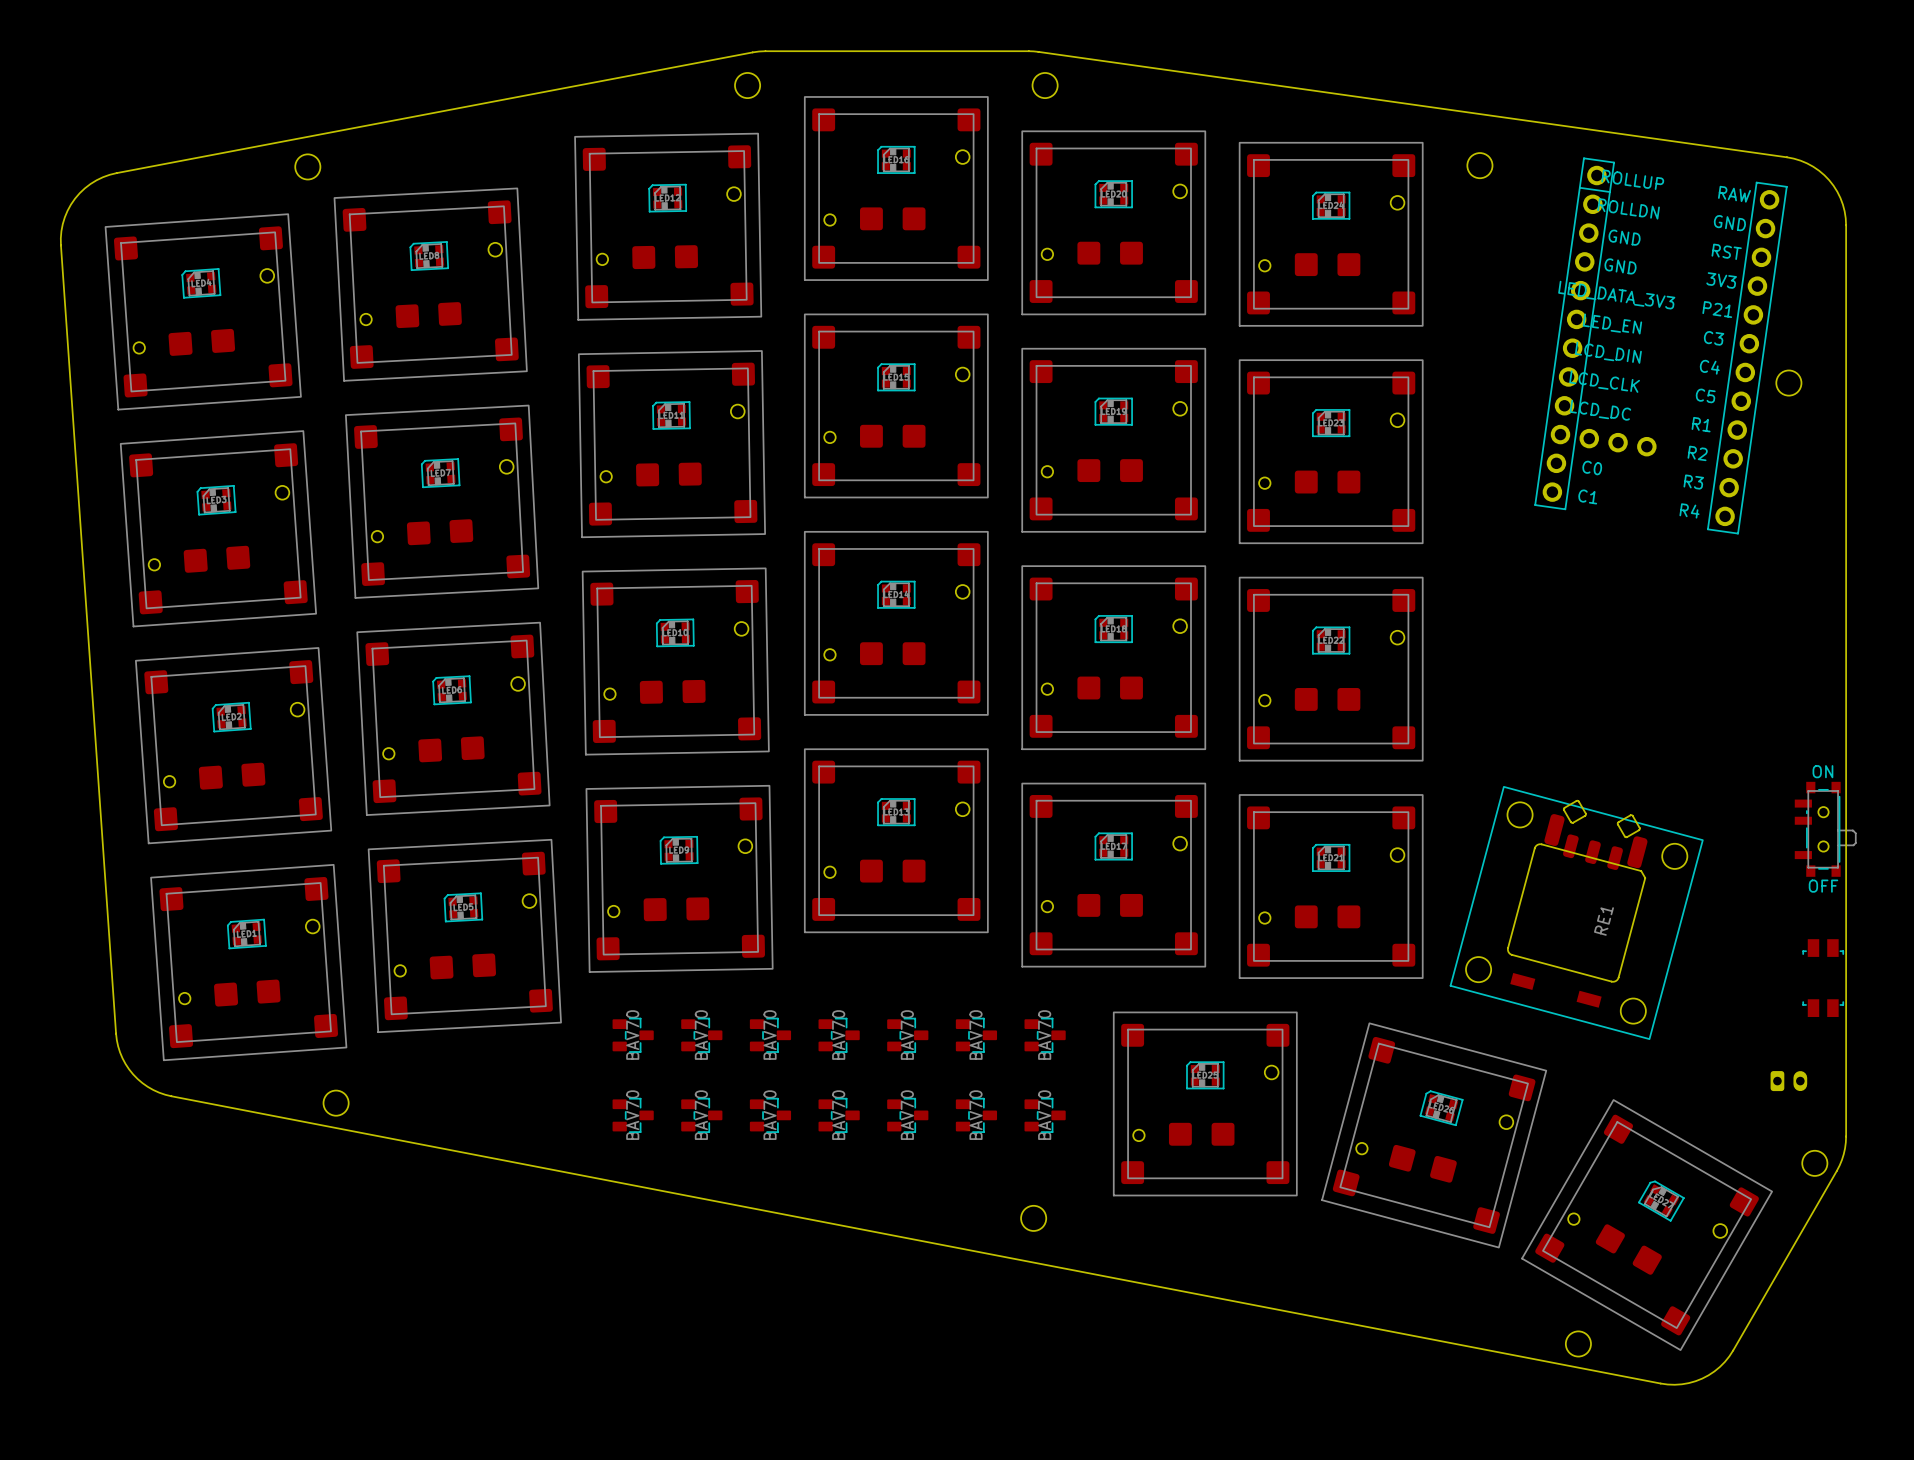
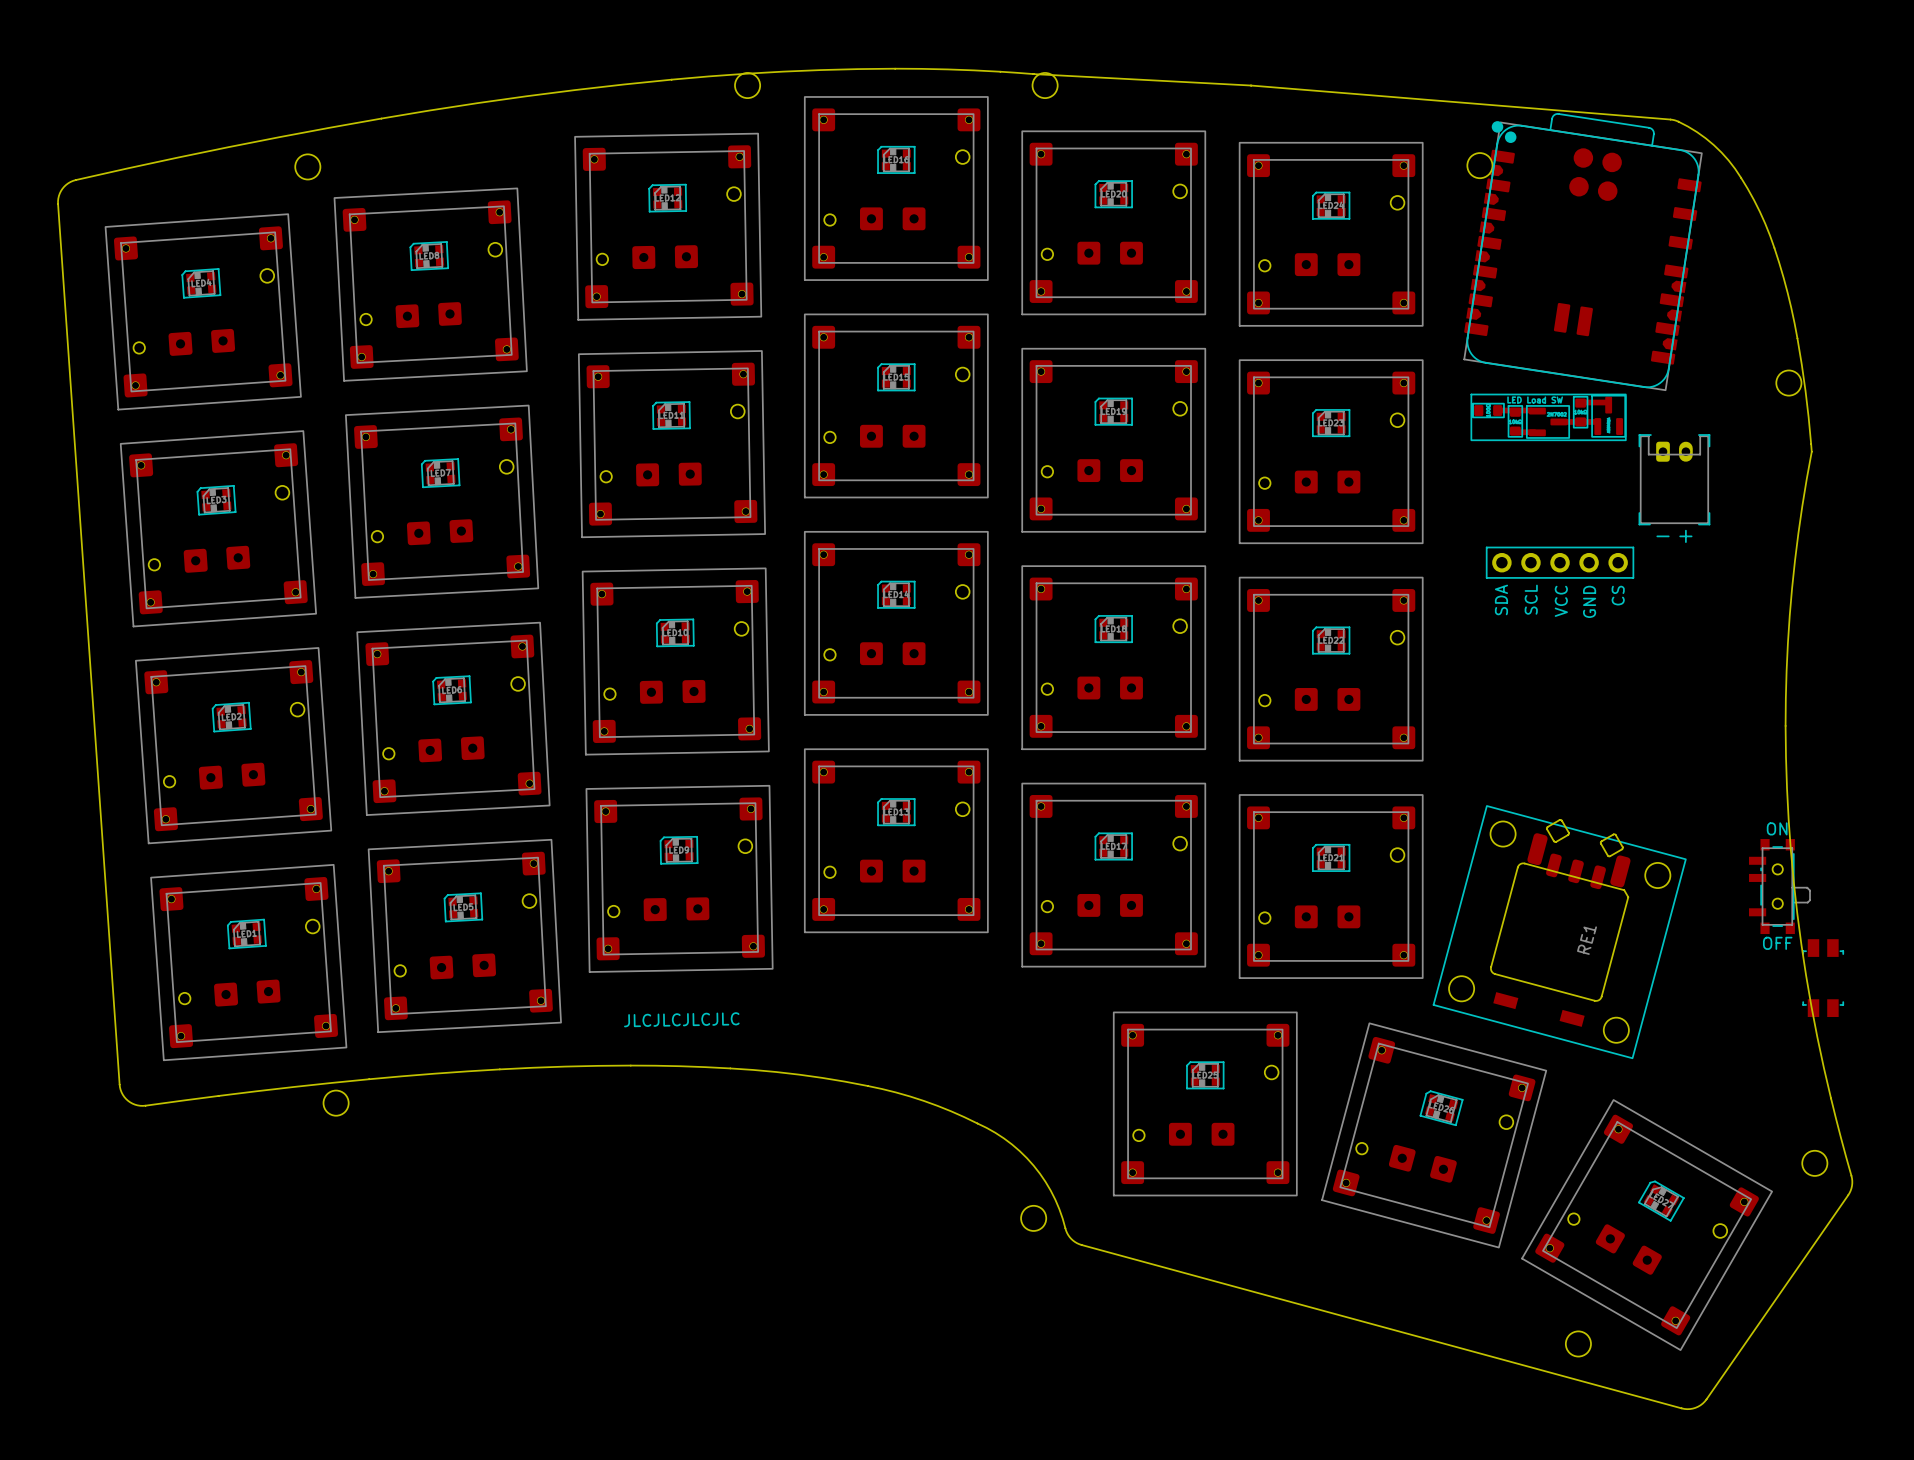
part footprint: [804, 96, 989, 281] -> [804, 96, 989, 281]
part footprint: [1021, 130, 1206, 315] -> [1021, 130, 1206, 315]
part footprint: [574, 133, 762, 321] -> [574, 133, 762, 321]
part footprint: [1239, 142, 1424, 327] -> [1239, 142, 1424, 327]
part footprint: [333, 187, 528, 382] -> [333, 187, 528, 382]
part footprint: [104, 213, 302, 411] -> [104, 213, 302, 411]
board edge: (60, 245) (64, 217) (75, 198) (90, 184) (109, 174) (765, 51) (1033, 51) (1787, 157) (1813, 166) (1829, 180) (1840, 198) (1845, 218) (1845, 1142) (1843, 1154) (1836, 1170) (1733, 1350) (1719, 1366) (1702, 1378) (1681, 1384) (1660, 1383) (171, 1096) (153, 1090) (133, 1074) (120, 1052) (116, 1033) -> (60, 245) (58, 198) (64, 186) (75, 180) (228, 147) (429, 110) (574, 90) (708, 76) (857, 69) (974, 70) (1251, 85) (1670, 119) (1687, 126) (1713, 145) (1728, 160) (1747, 188) (1759, 211) (1783, 277) (1801, 364) (1811, 451) (1798, 533) (1787, 643) (1785, 725) (1788, 819) (1797, 913) (1811, 1006) (1823, 1067) (1852, 1183) (1848, 1195) (1706, 1399) (1695, 1407) (1684, 1408) (1079, 1244) (1071, 1238) (1067, 1232) (1059, 1209) (1045, 1181) (1026, 1158) (1012, 1144) (986, 1127) (951, 1111) (923, 1100) (882, 1089) (822, 1077) (753, 1069) (655, 1065) (565, 1066) (467, 1071) (369, 1079) (140, 1105) (128, 1100) (120, 1089) (116, 1033)
part: none -> (1583, 251)
part footprint: [804, 313, 989, 499] -> [804, 313, 989, 499]
part: (1660, 345) -> none
part footprint: [1021, 348, 1206, 533] -> [1021, 348, 1206, 533]
part footprint: [578, 350, 766, 538] -> [578, 350, 766, 538]
part footprint: [1239, 359, 1424, 544] -> [1239, 359, 1424, 544]
part footprint: [345, 404, 539, 599] -> [345, 404, 539, 599]
part: none -> (1548, 417)
part footprint: [120, 430, 317, 628] -> [120, 430, 317, 628]
part: none -> (1674, 488)
part footprint: [804, 531, 989, 716] -> [804, 531, 989, 716]
part: none -> (1560, 562)
part footprint: [1021, 565, 1206, 750] -> [1021, 565, 1206, 750]
part footprint: [582, 567, 770, 756] -> [582, 567, 770, 756]
part footprint: [1239, 577, 1424, 762] -> [1239, 577, 1424, 762]
part footprint: [356, 622, 551, 816] -> [356, 622, 551, 816]
part footprint: [135, 647, 332, 844] -> [135, 647, 332, 844]
part footprint: [804, 748, 989, 933] -> [804, 748, 989, 933]
part footprint: [1021, 782, 1206, 968] -> [1021, 782, 1206, 968]
part footprint: [585, 785, 774, 973] -> [585, 785, 774, 973]
part footprint: [1239, 794, 1424, 979] -> [1239, 794, 1424, 979]
part position: (1825, 829) -> (1779, 886)
part footprint: [368, 839, 562, 1033] -> [368, 839, 562, 1033]
part footprint: [150, 864, 348, 1061] -> [150, 864, 348, 1061]
RE1 position: (1576, 912) -> (1559, 932)
part footprint: [1113, 1011, 1298, 1197] -> [1113, 1011, 1298, 1197]
text: none -> JLCJLCJLCJLC (681, 1019)
part footprint: [1321, 1022, 1547, 1249] -> [1321, 1022, 1547, 1249]
part: BAV70 (633, 1035) -> none
part: BAV70 (701, 1035) -> none
part: BAV70 (770, 1035) -> none
part: BAV70 (839, 1035) -> none
part: BAV70 (907, 1035) -> none
part: BAV70 (976, 1035) -> none
part: BAV70 (1045, 1035) -> none
part: (1788, 1081) -> none
part footprint: [1521, 1099, 1773, 1351] -> [1521, 1099, 1773, 1351]
part: BAV70 (633, 1115) -> none
part: BAV70 (701, 1115) -> none
part: BAV70 (770, 1115) -> none
part: BAV70 (839, 1115) -> none
part: BAV70 (907, 1115) -> none
part: BAV70 (976, 1115) -> none
part: BAV70 (1045, 1115) -> none

